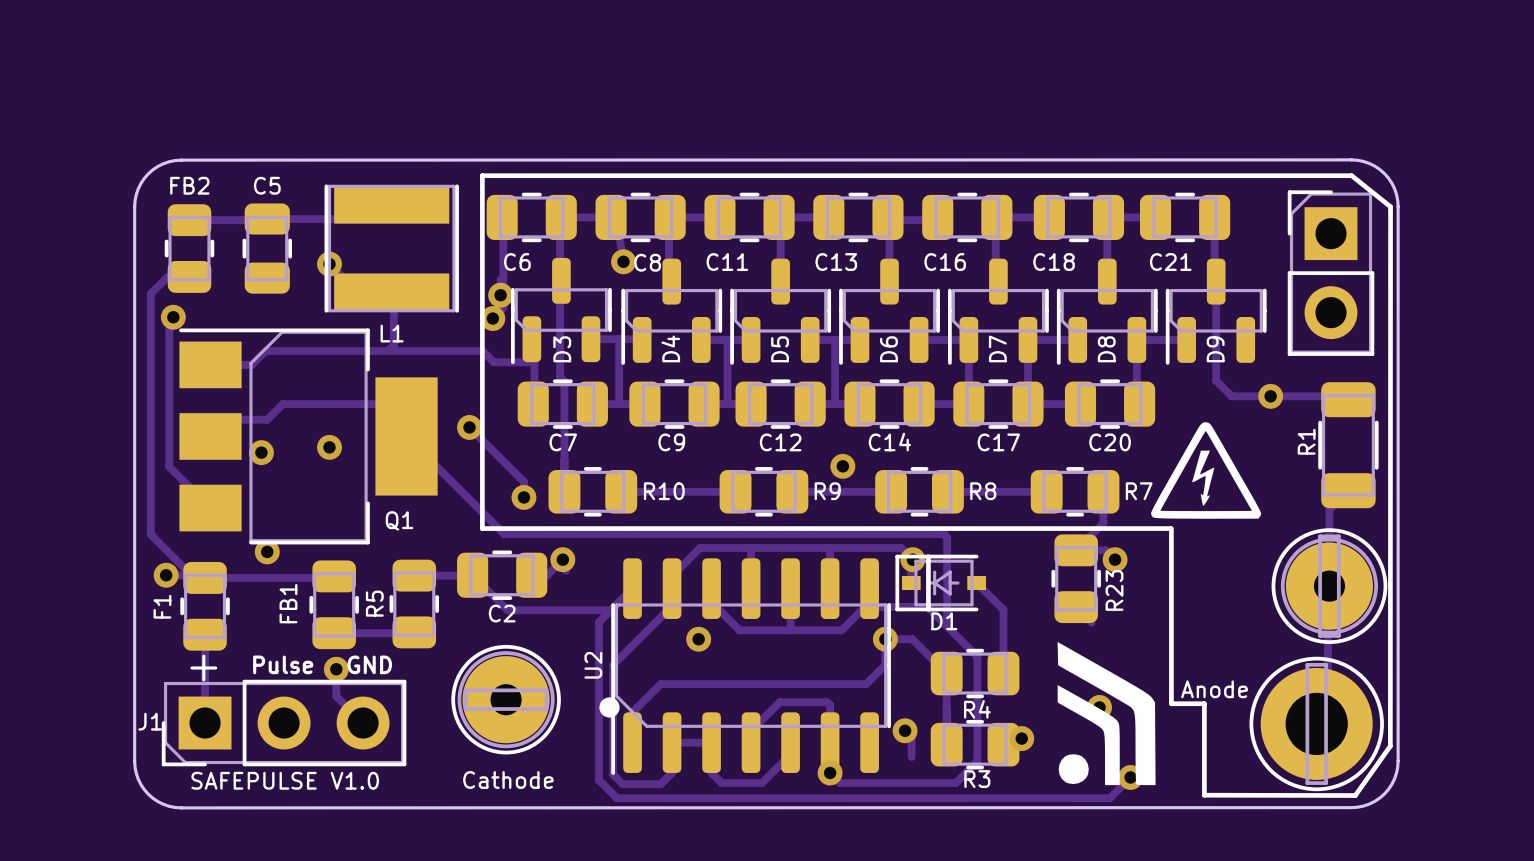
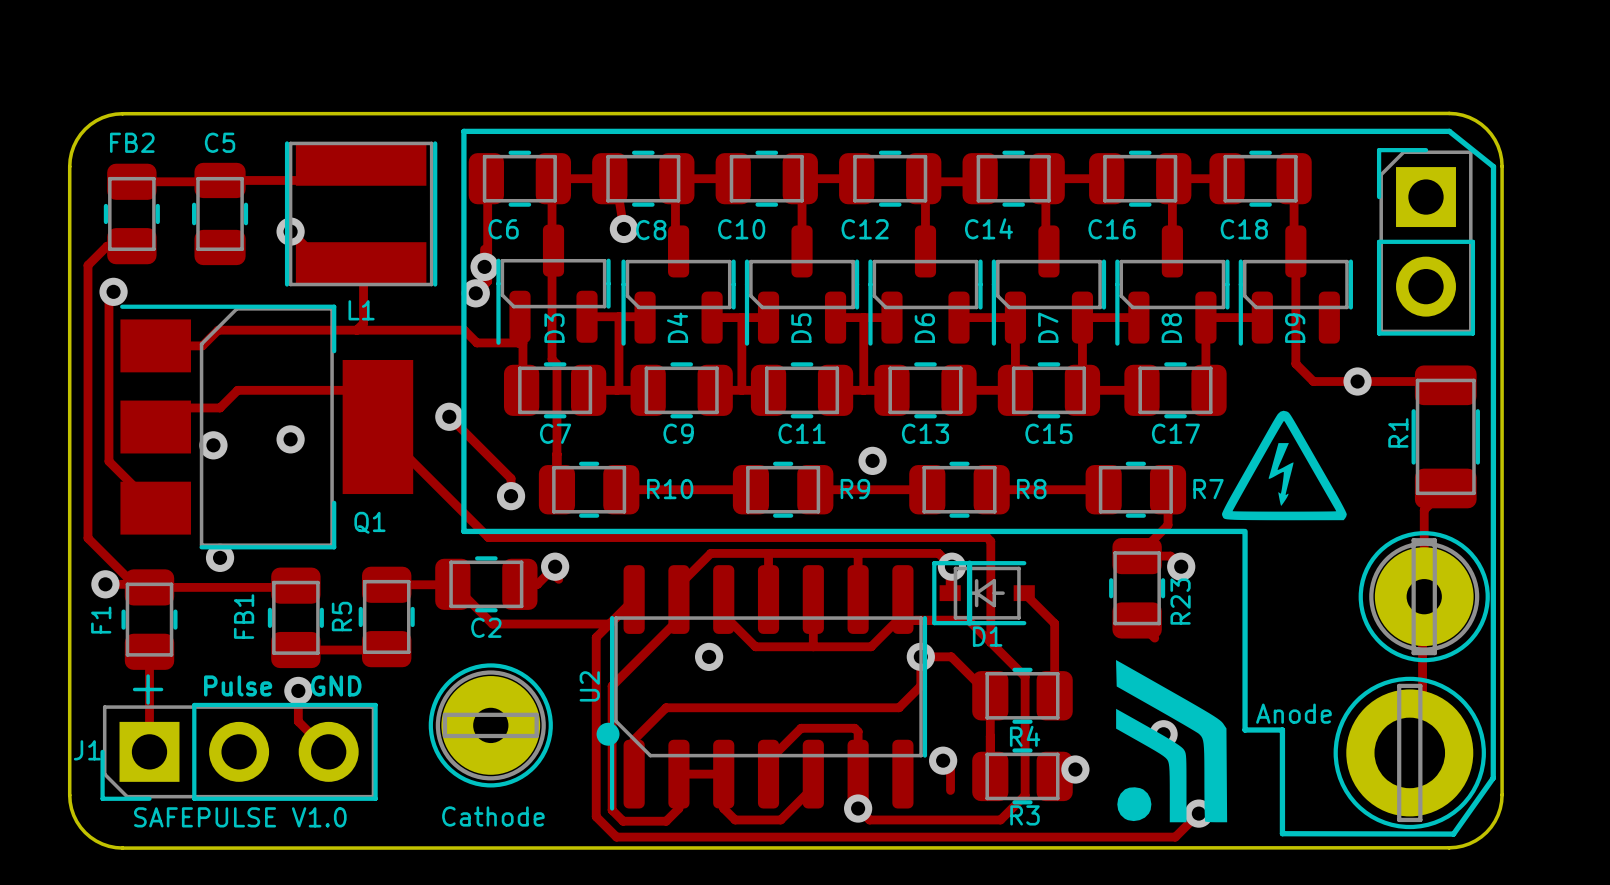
C11 name: C11 (727, 262) -> C10 (741, 229)
C13 name: C13 (836, 262) -> C12 (865, 229)
C16 name: C16 (945, 262) -> C14 (988, 228)
C18 name: C18 (1054, 262) -> C16 (1112, 229)
C21 name: C21 (1170, 262) -> C18 (1244, 229)
C12 name: C12 (780, 442) -> C11 (802, 433)
C14 name: C14 (889, 442) -> C13 (925, 433)
C17 name: C17 (998, 442) -> C15 (1048, 433)
C20 name: C20 (1110, 442) -> C17 (1175, 433)

